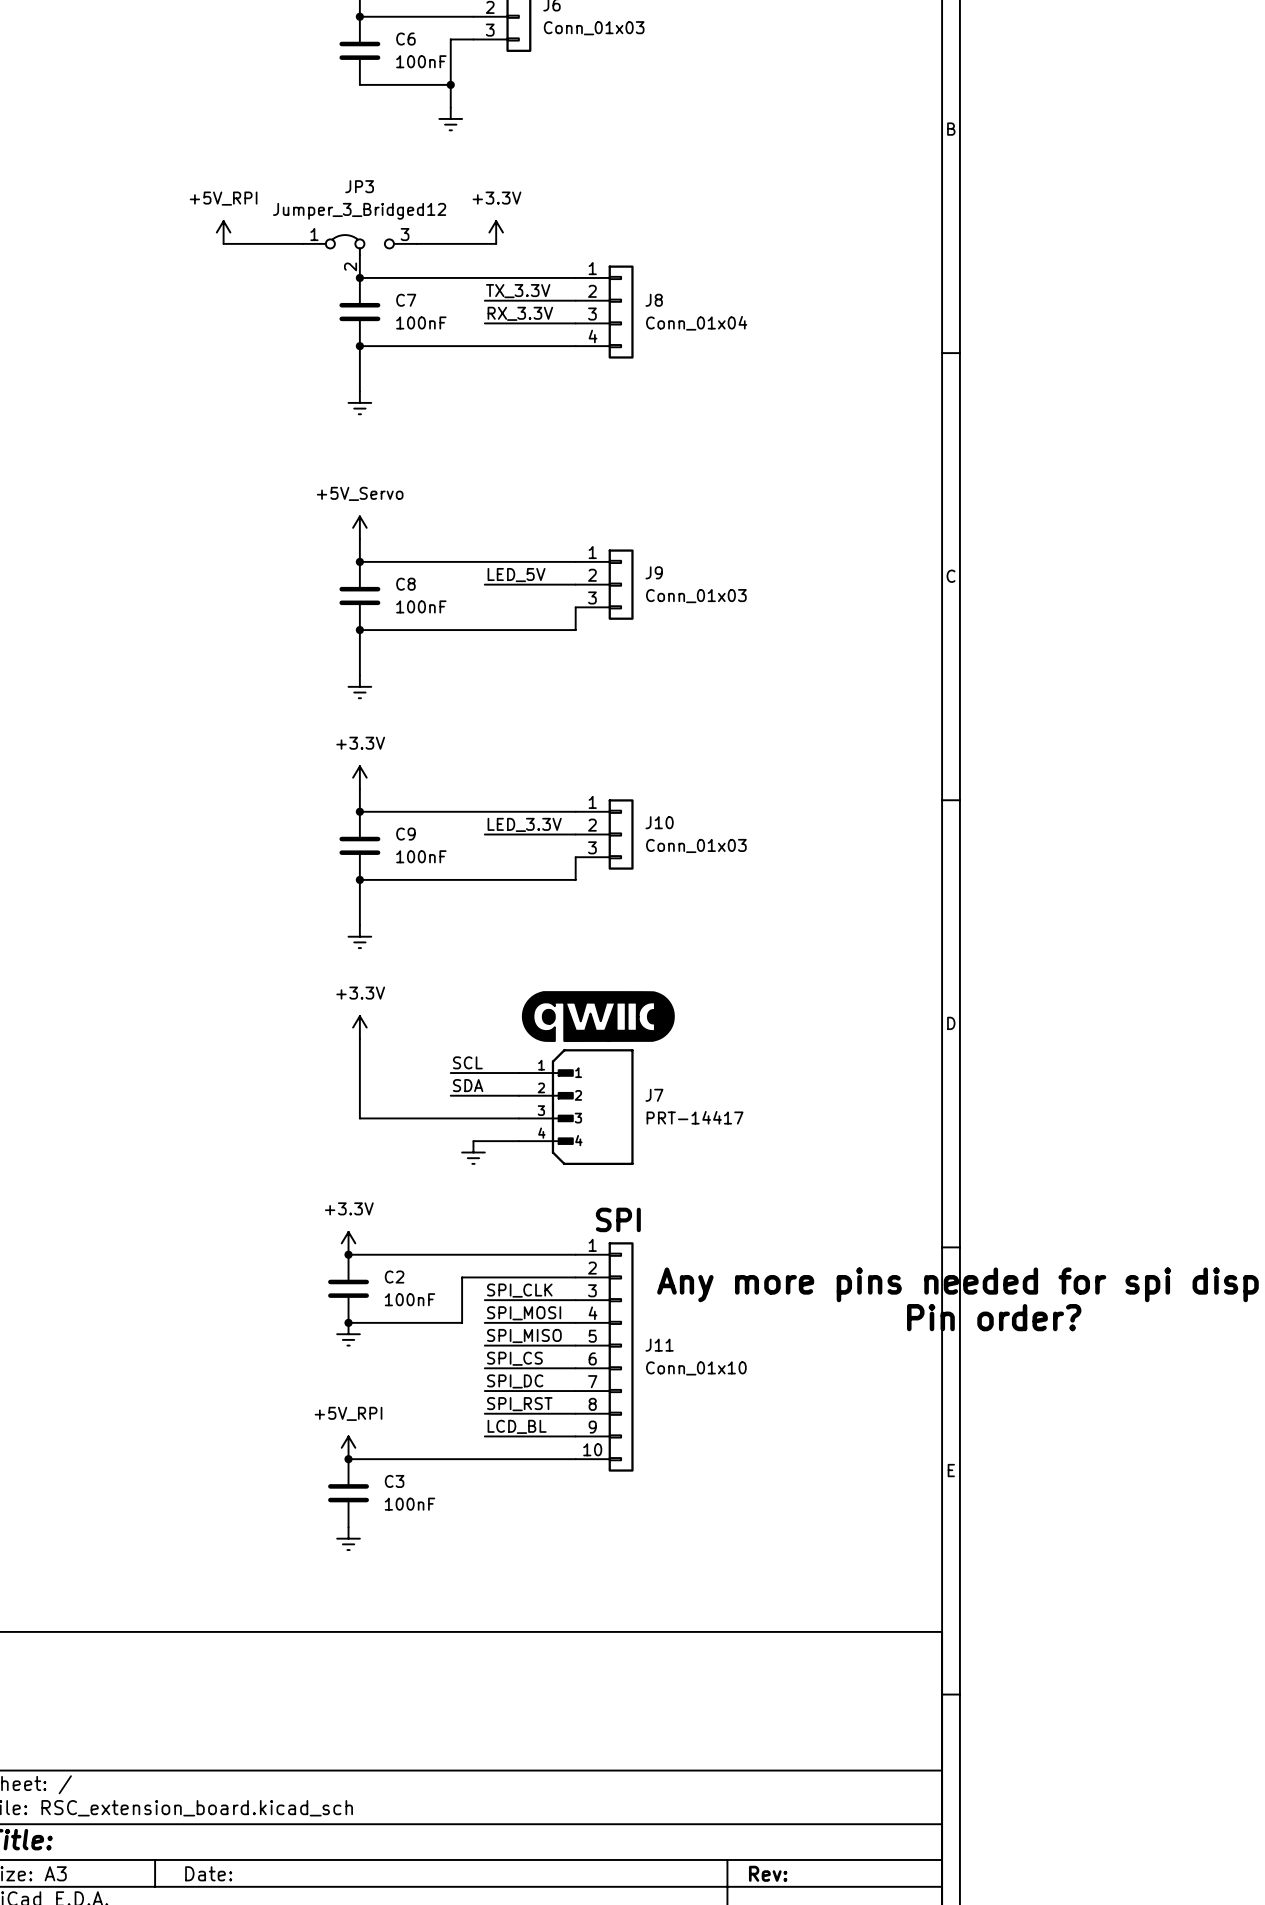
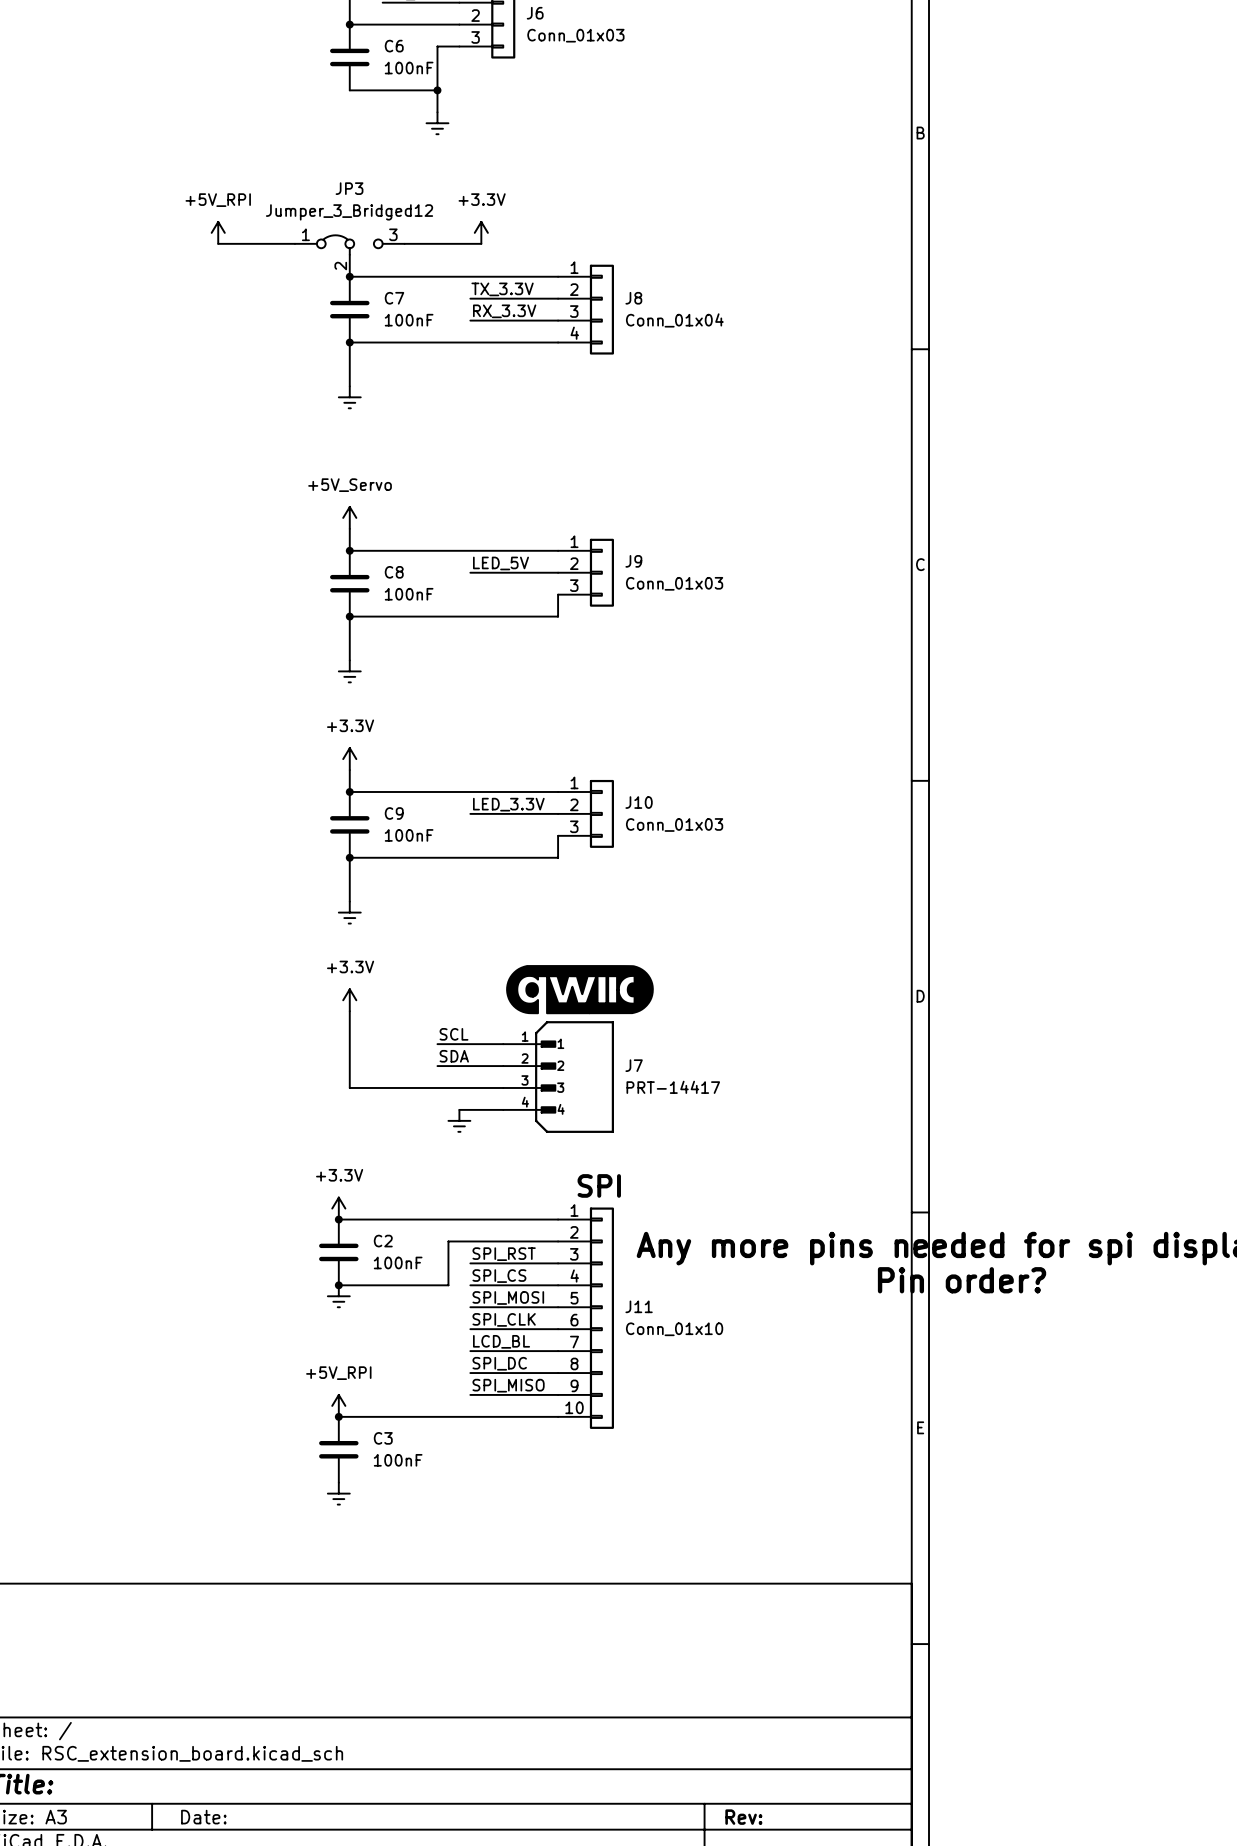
label: SPI_CLK (519, 1290) -> SPI_RST (504, 1254)
label: SPI_MOSI (524, 1313) -> SPI_CS (499, 1276)
label: SPI_MISO (524, 1335) -> SPI_MOSI (508, 1297)
label: SPI_CS (514, 1358) -> SPI_CLK (504, 1319)
label: SPI_DC (515, 1381) -> LCD_BL (501, 1341)
label: SPI_RST (519, 1404) -> SPI_DC (499, 1363)
label: LCD_BL (517, 1426) -> SPI_MISO (508, 1385)

